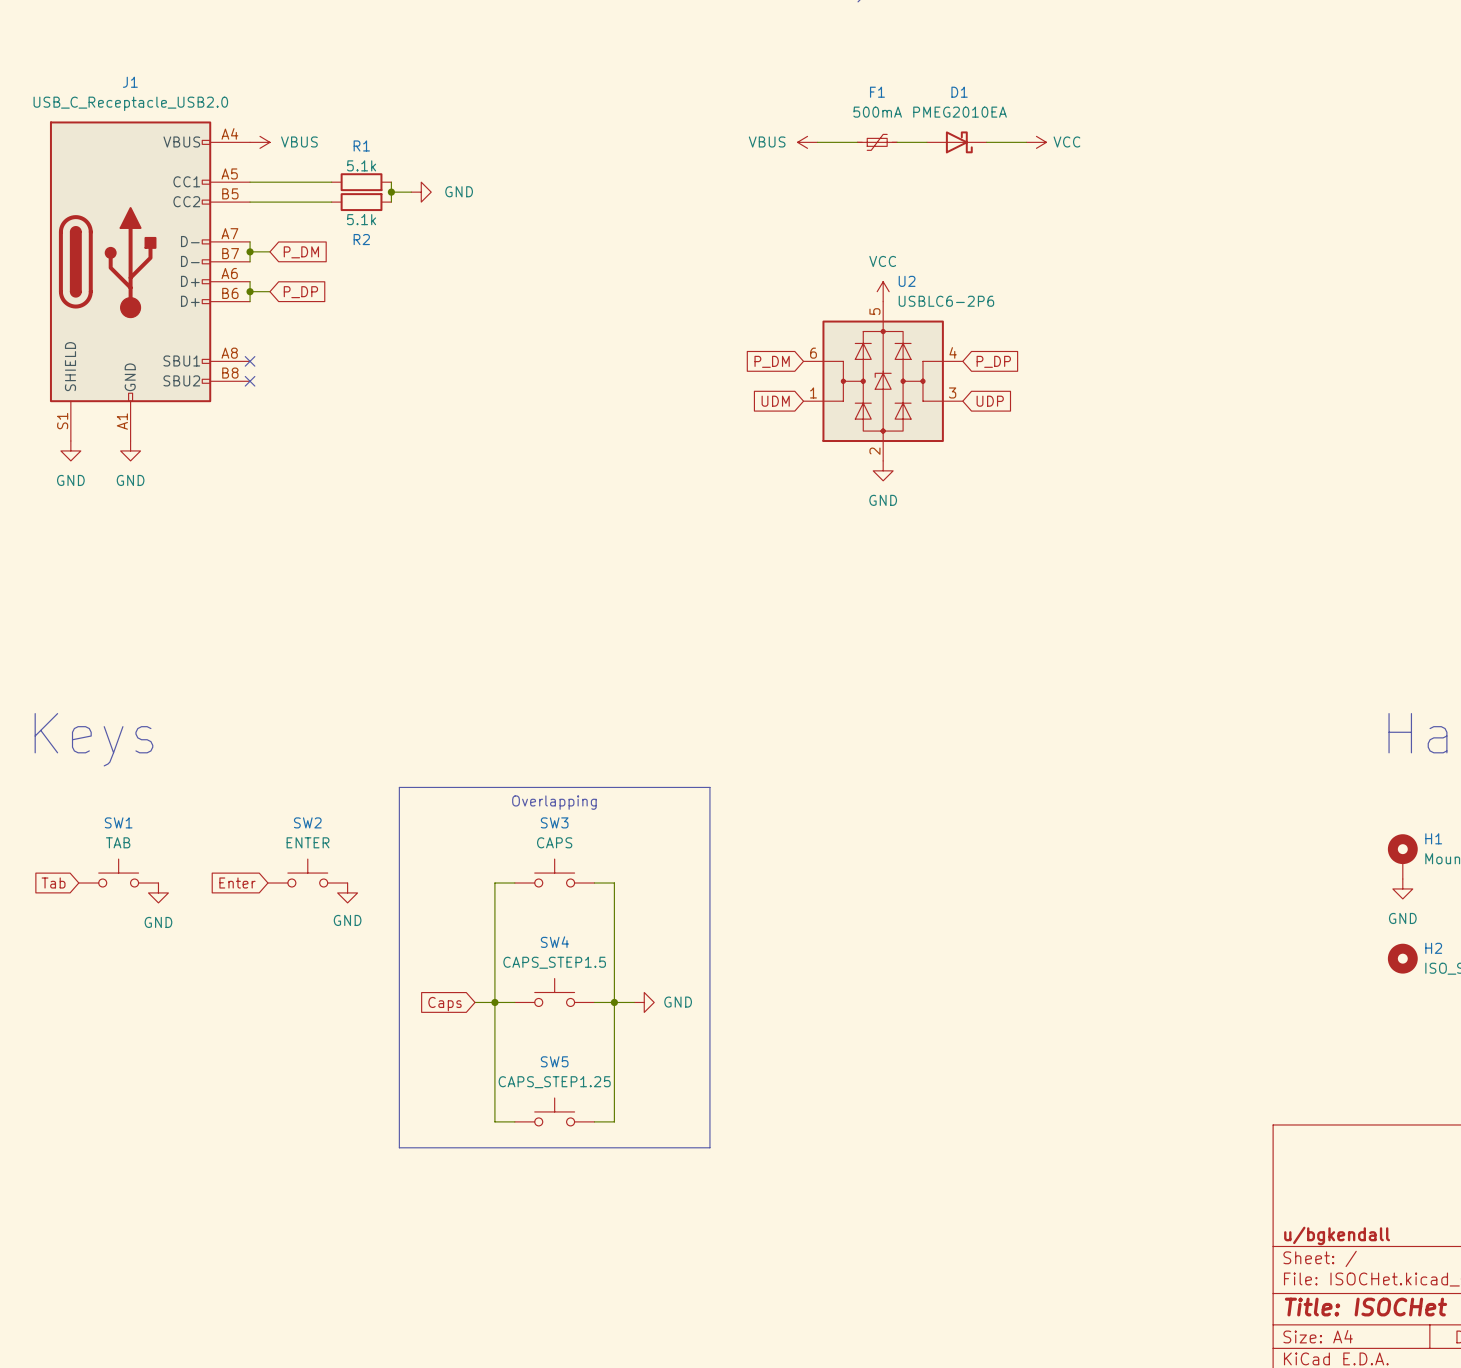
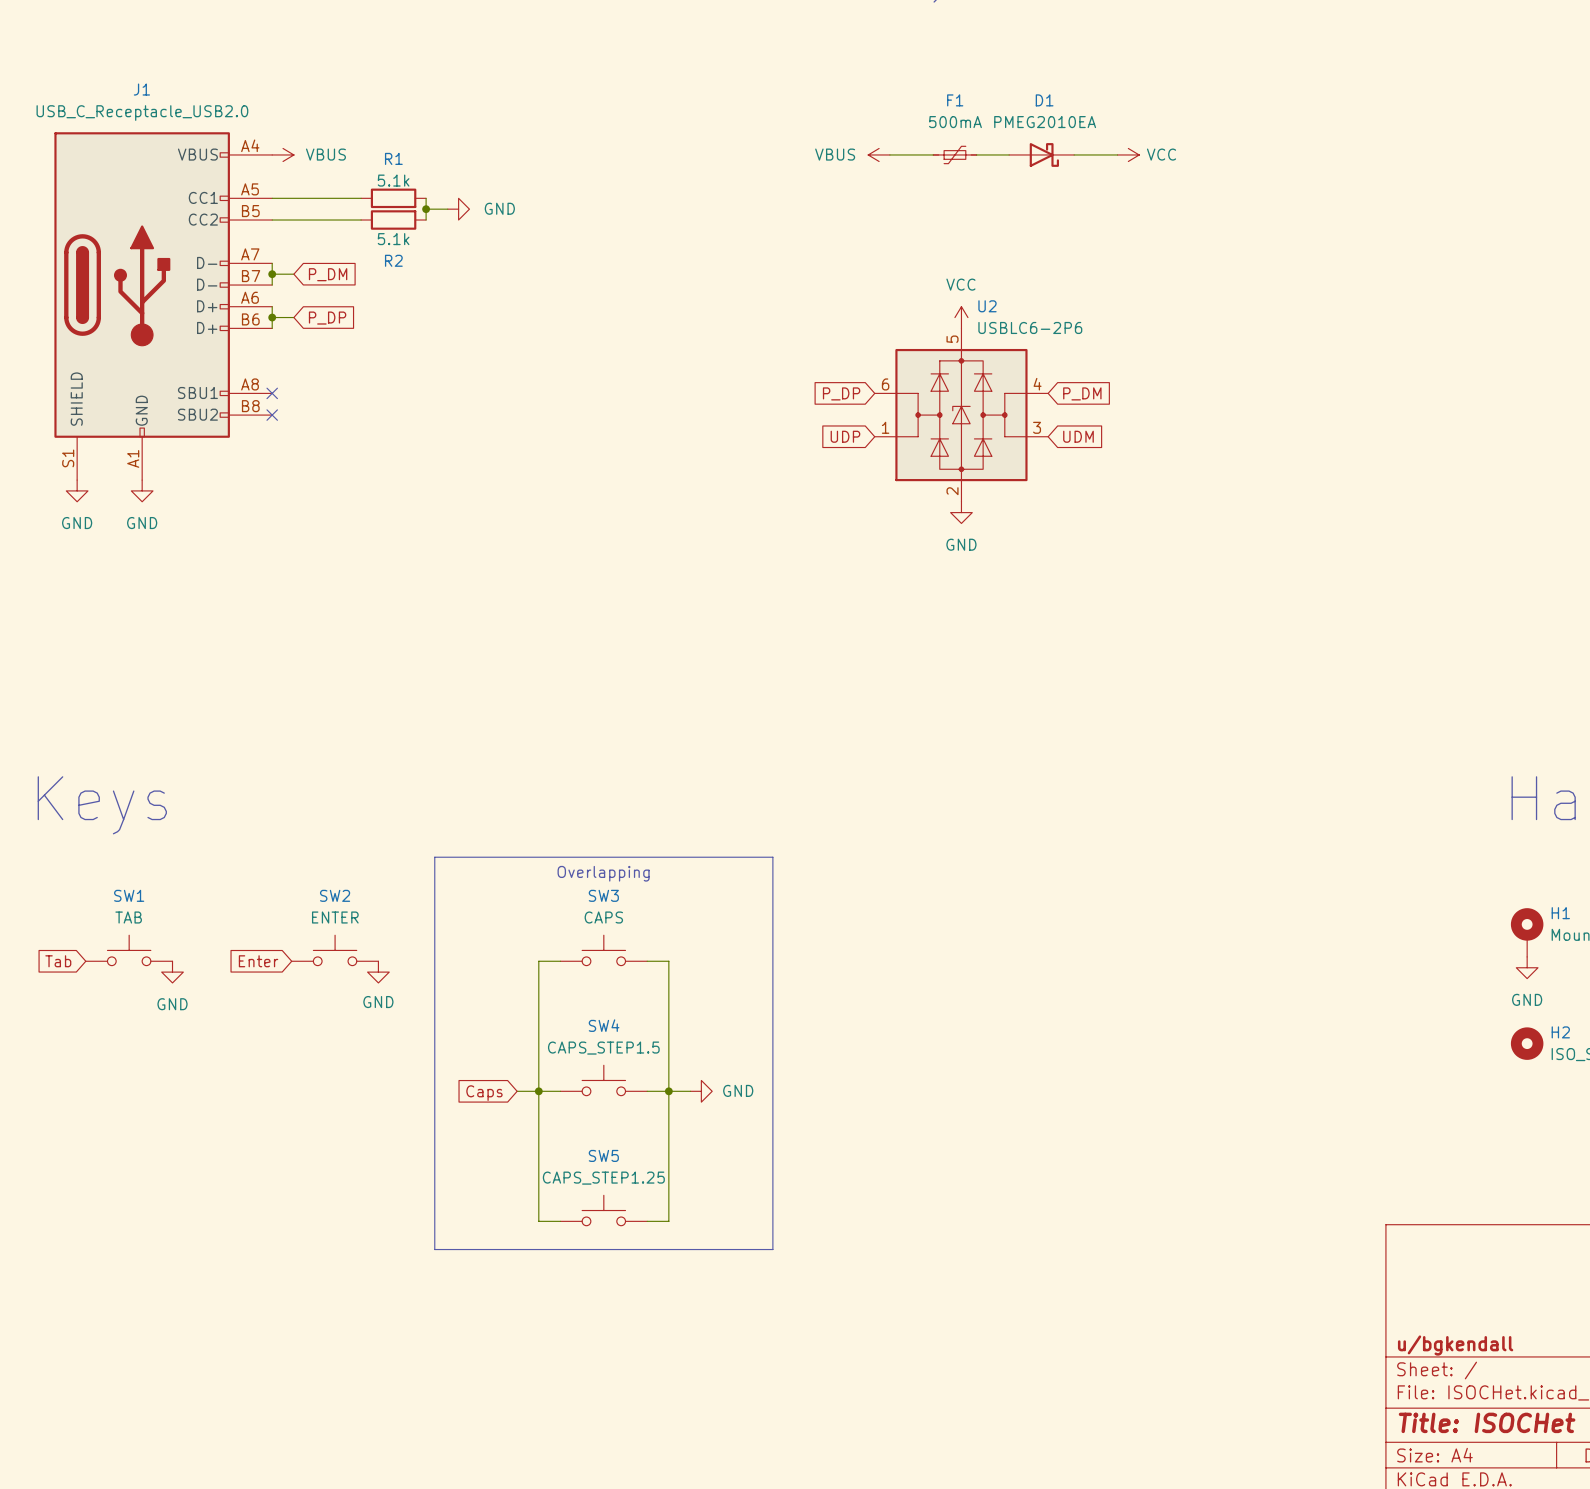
global label: P_DM (772, 361) -> P_DP (841, 393)
global label: P_DP (993, 361) -> P_DM (1082, 393)
global label: UDM (775, 401) -> UDP (845, 436)
global label: UDP (990, 401) -> UDM (1078, 436)

